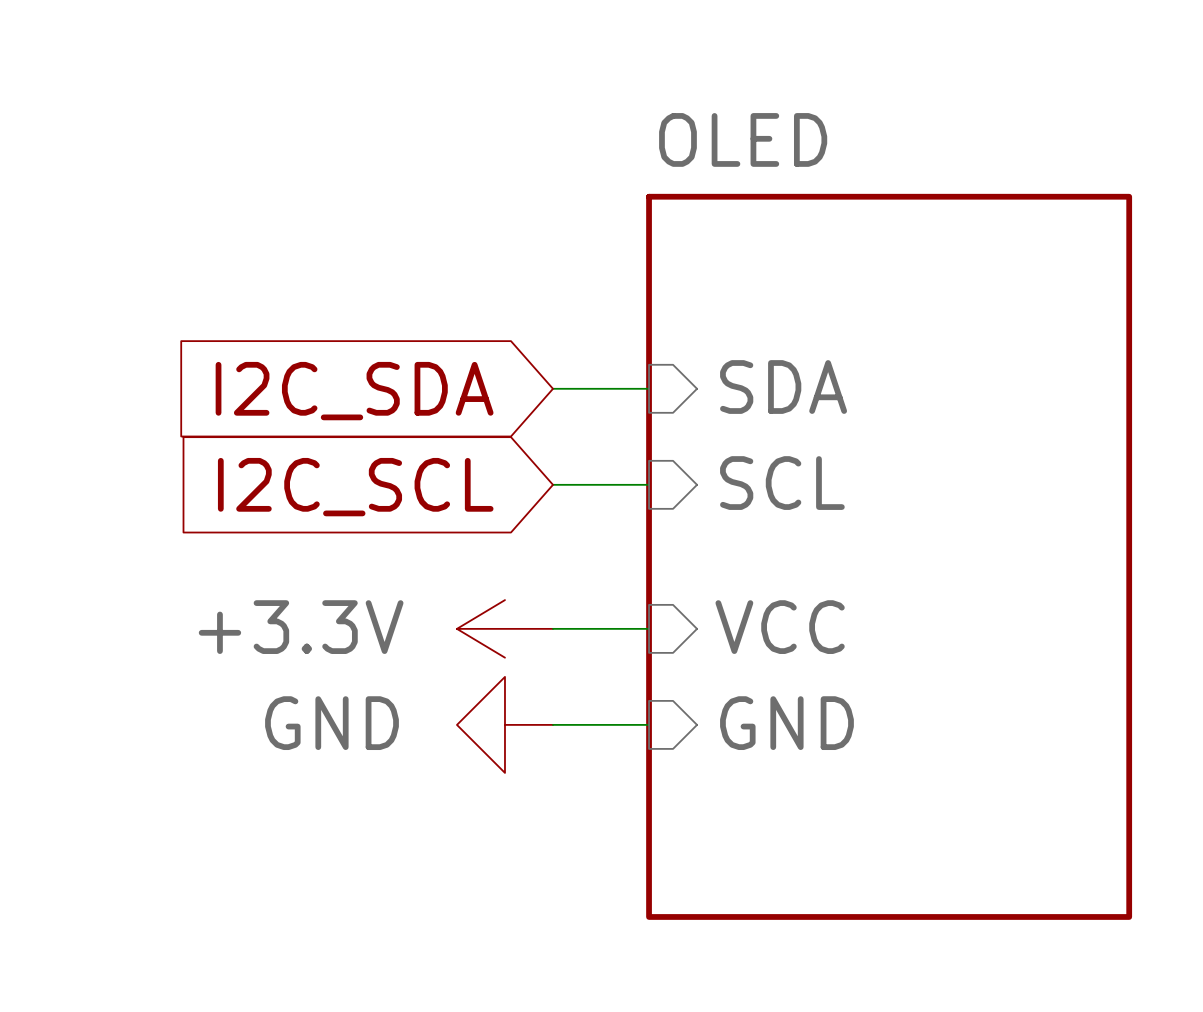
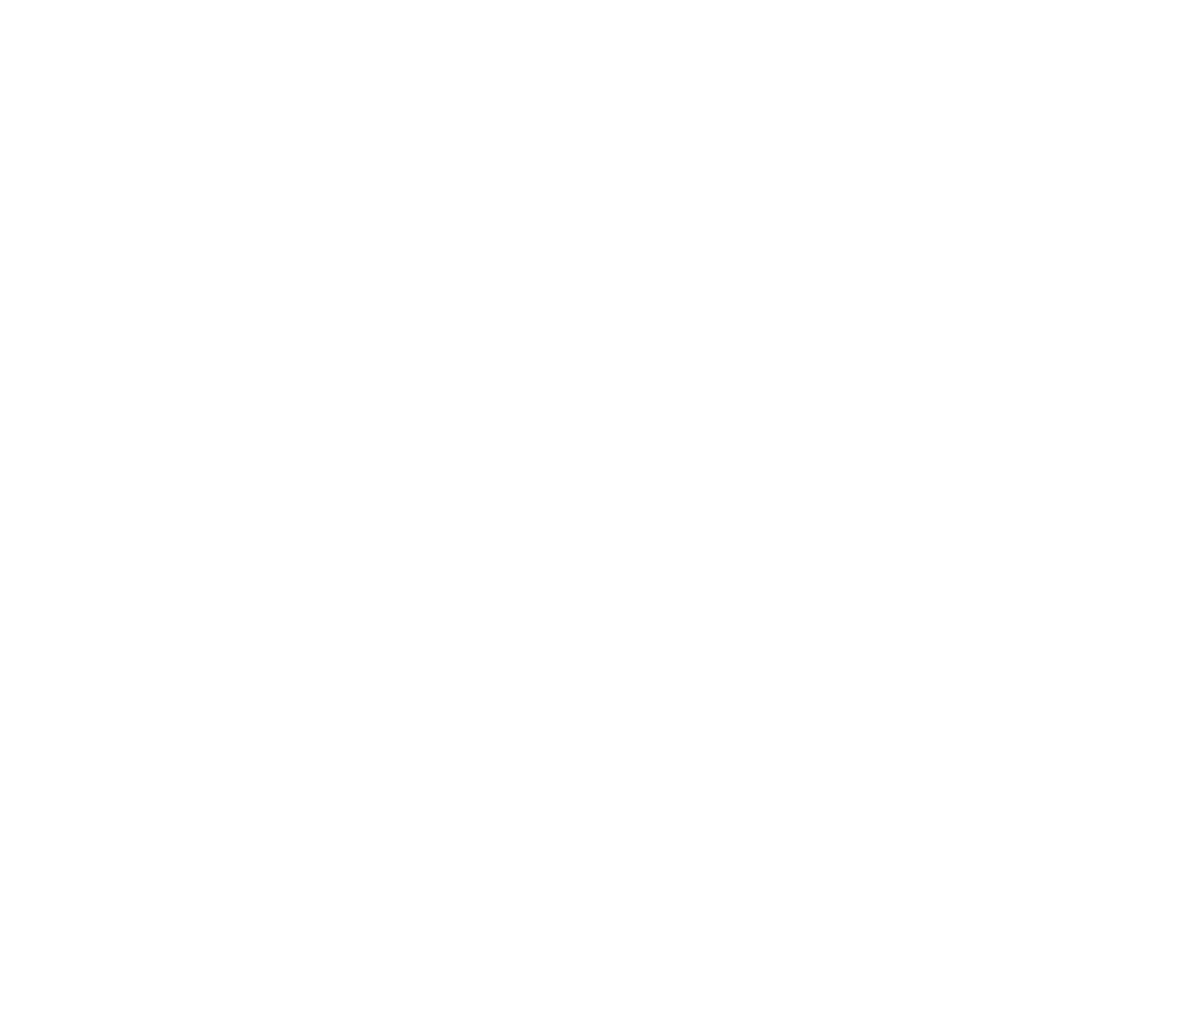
sheet pin: SDA (783, 387) -> none
wire: (553, 388) (649, 388) -> none
global label: I2C_SDA (354, 391) -> none
sheet pin: SCL (782, 483) -> none
wire: (553, 484) (649, 484) -> none
global label: I2C_SCL (355, 487) -> none
sheet OLED: (889, 556) -> none
sheet pin: VCC (780, 627) -> none
power symbol: +3.3V (504, 628) -> none
wire: (553, 628) (649, 628) -> none
sheet pin: GND (786, 723) -> none
power symbol: GND (504, 724) -> none
wire: (553, 724) (649, 724) -> none

